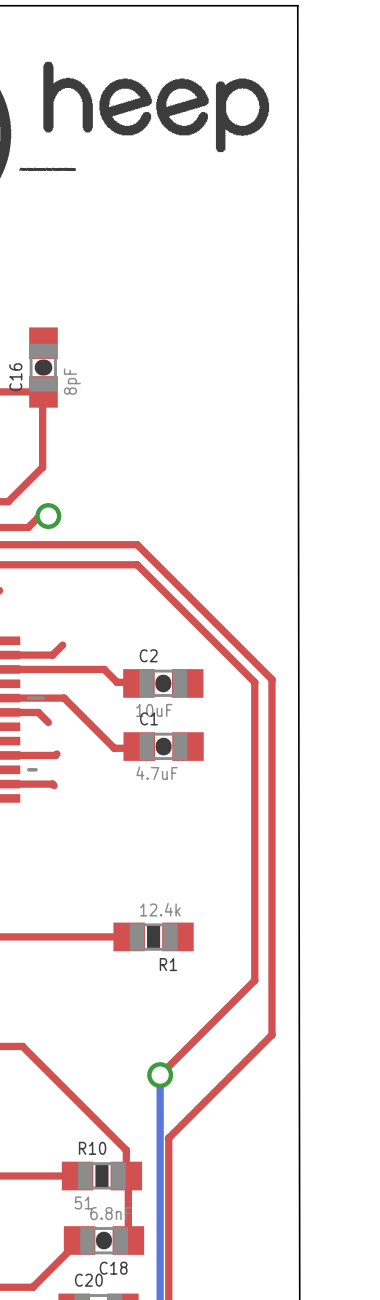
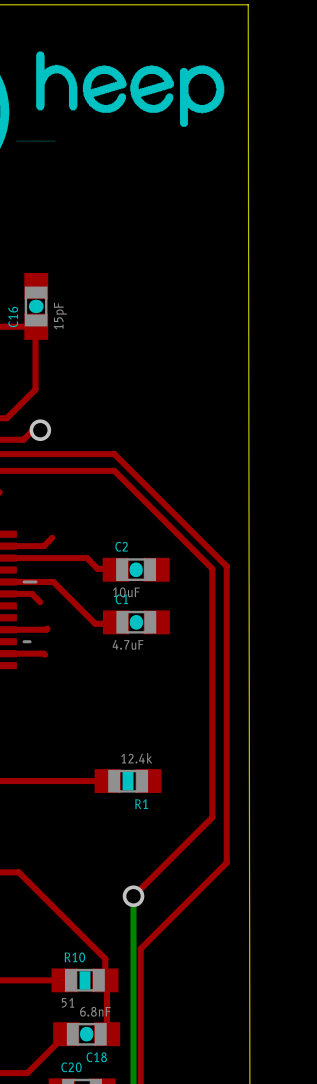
C16 value: 8pF (72, 381) -> 15pF (60, 316)

